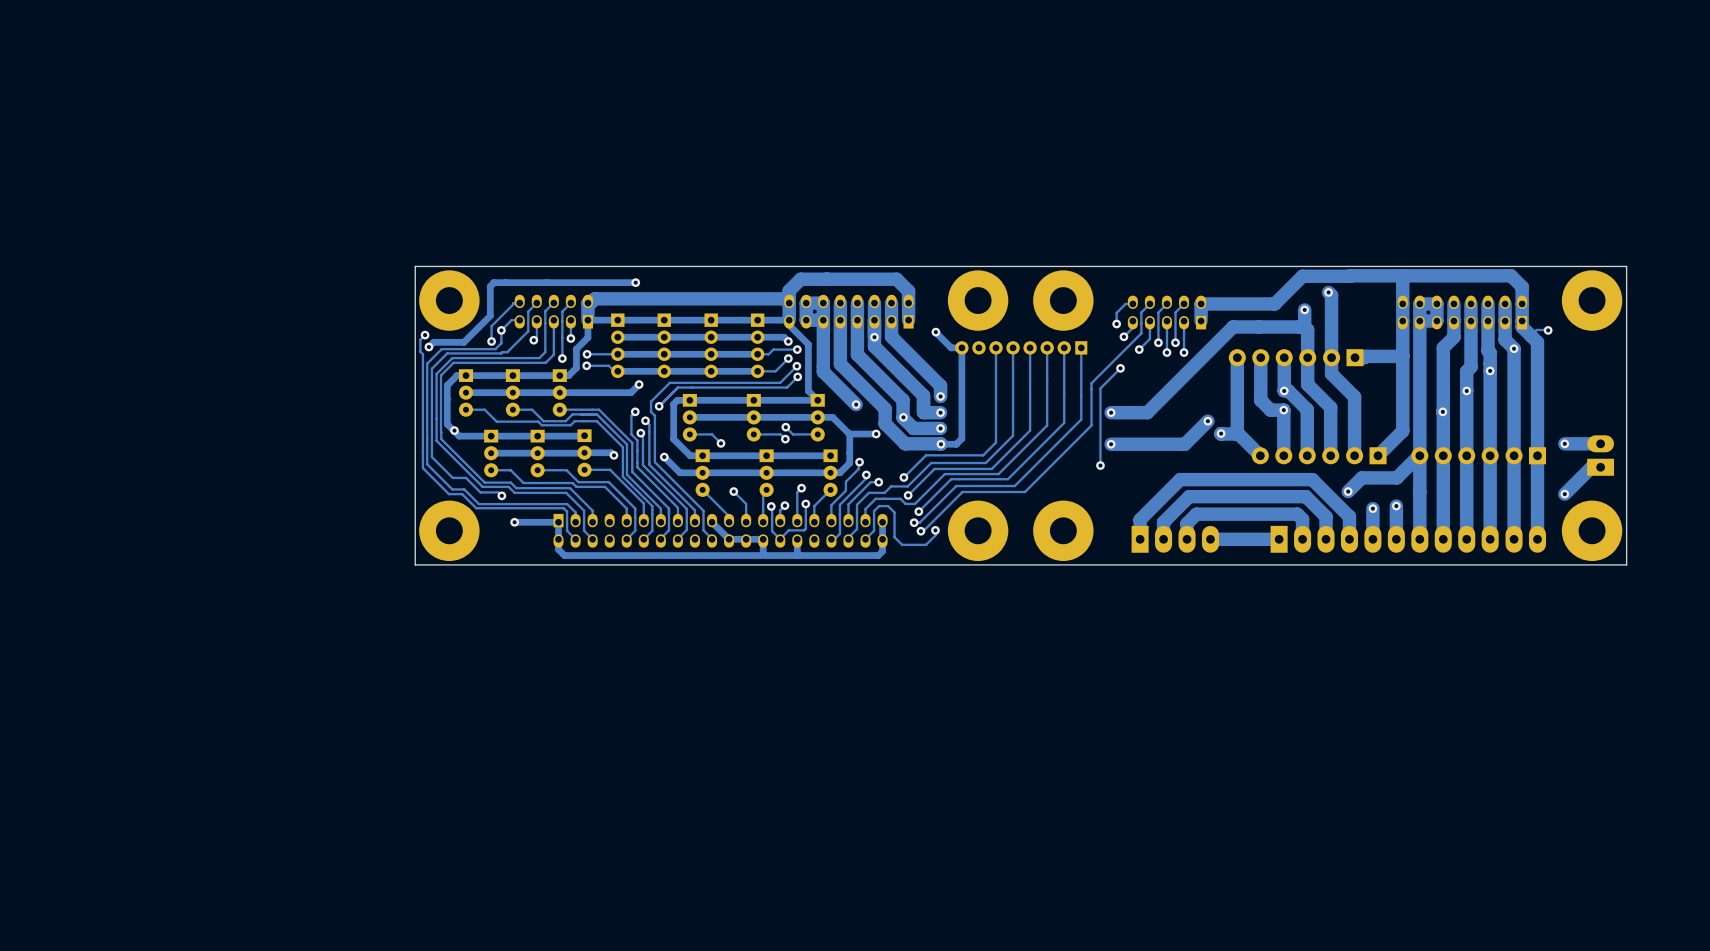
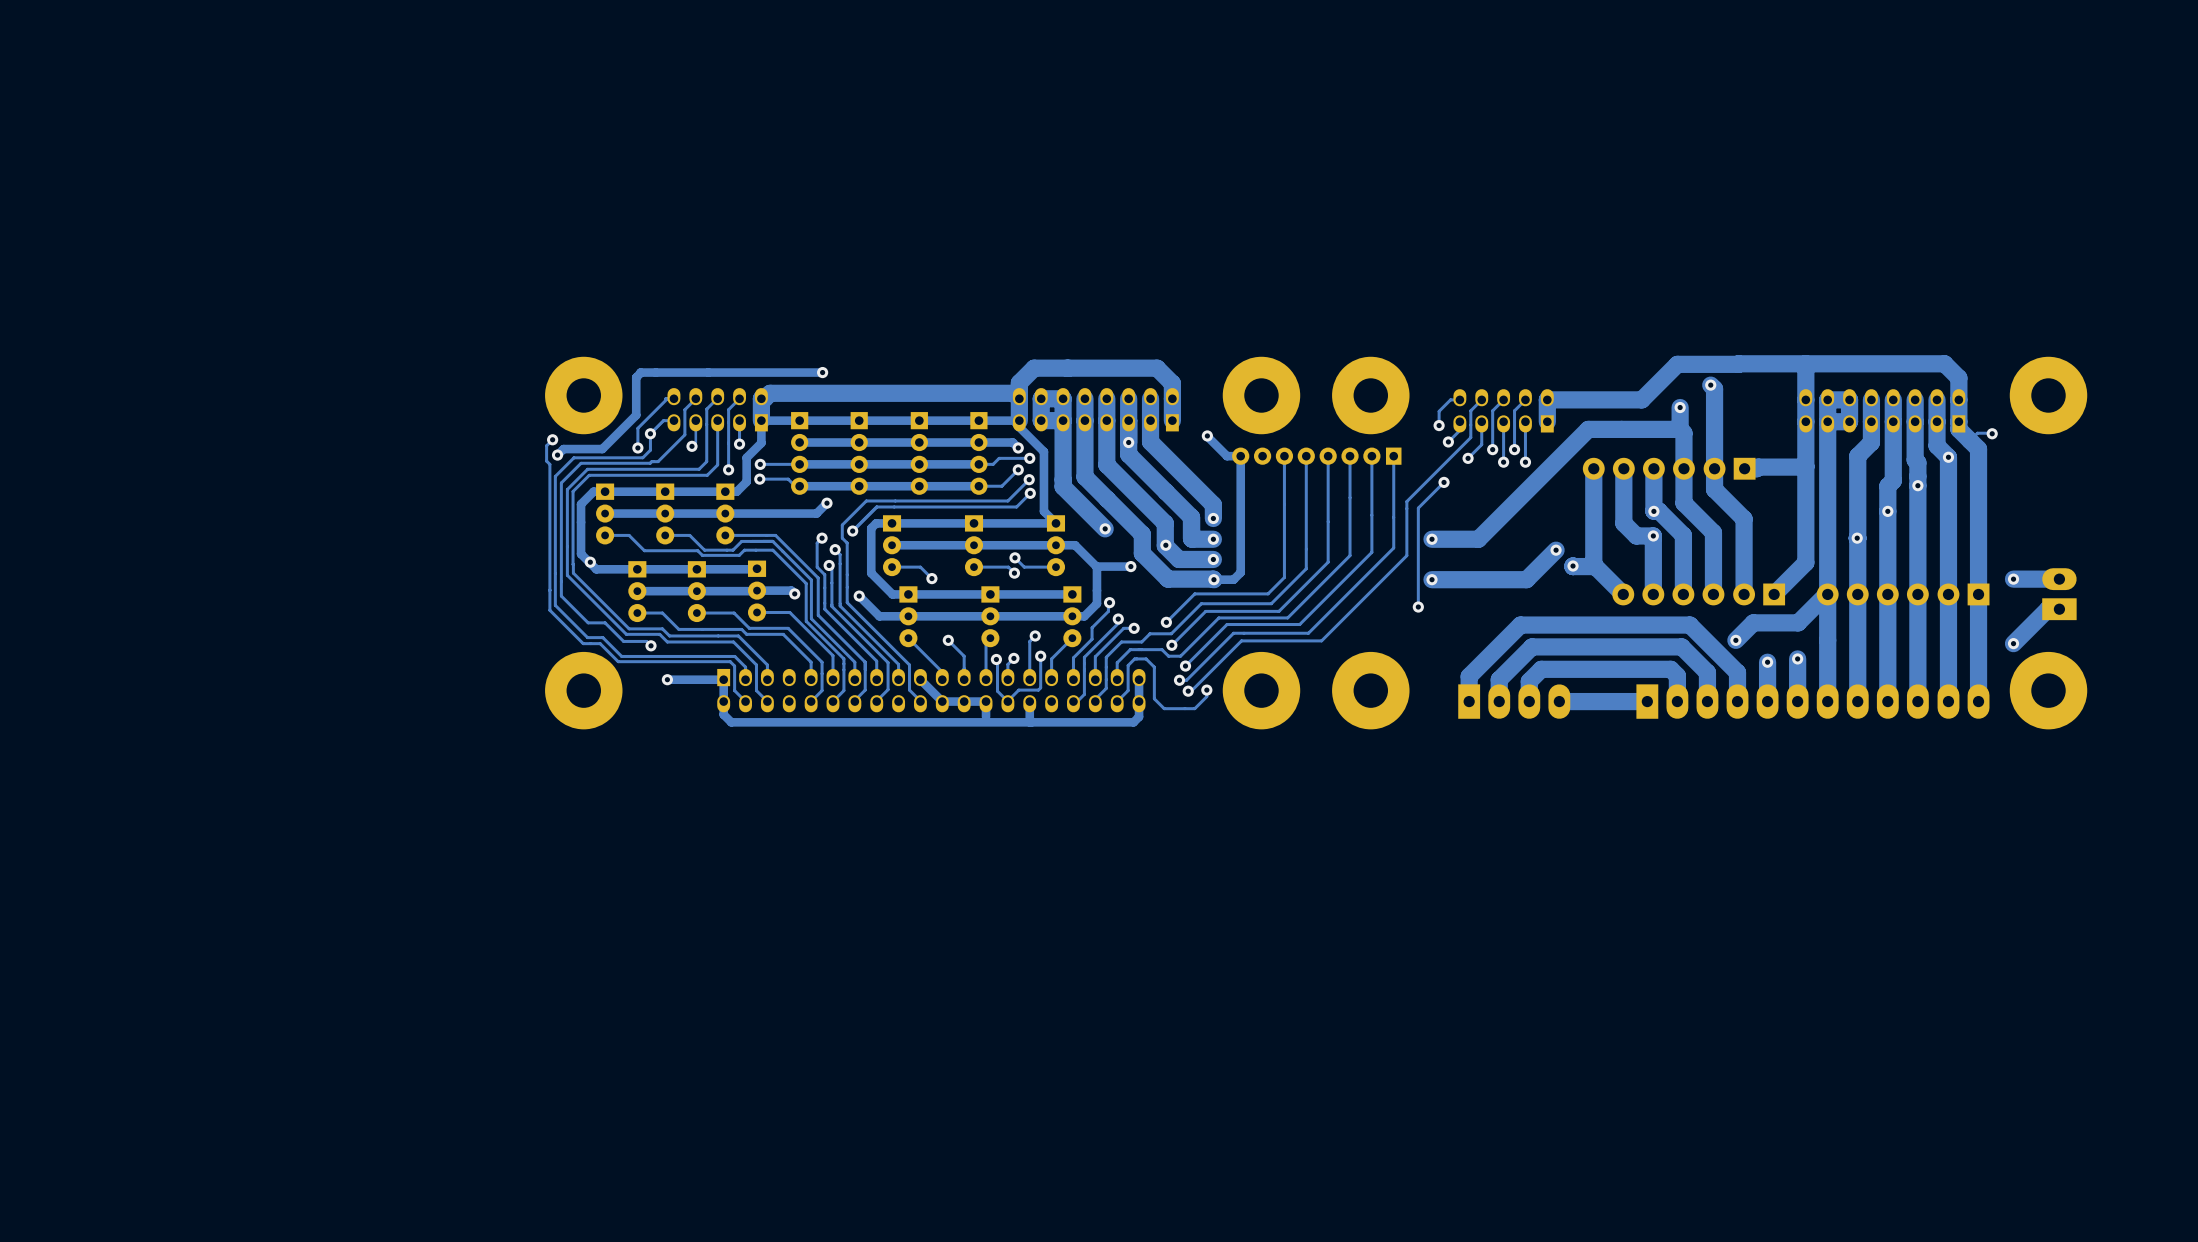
board edge: (1626, 266) (1626, 564) (415, 564) (415, 266) (1626, 266) -> none

